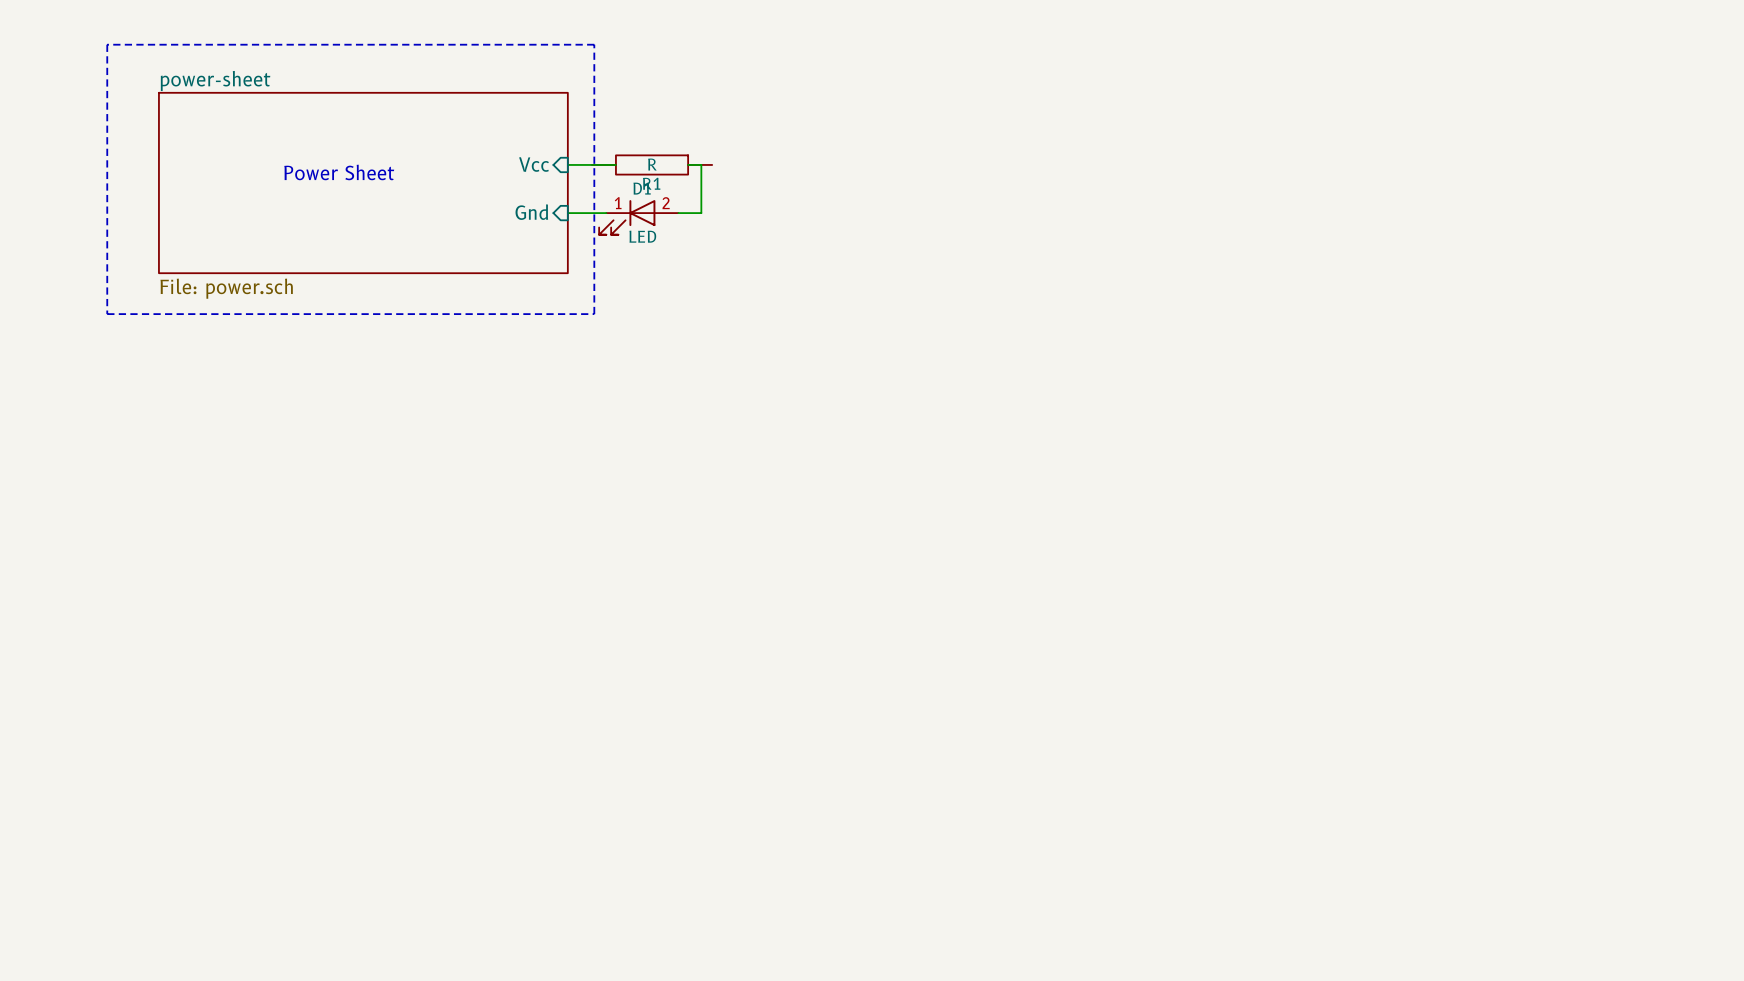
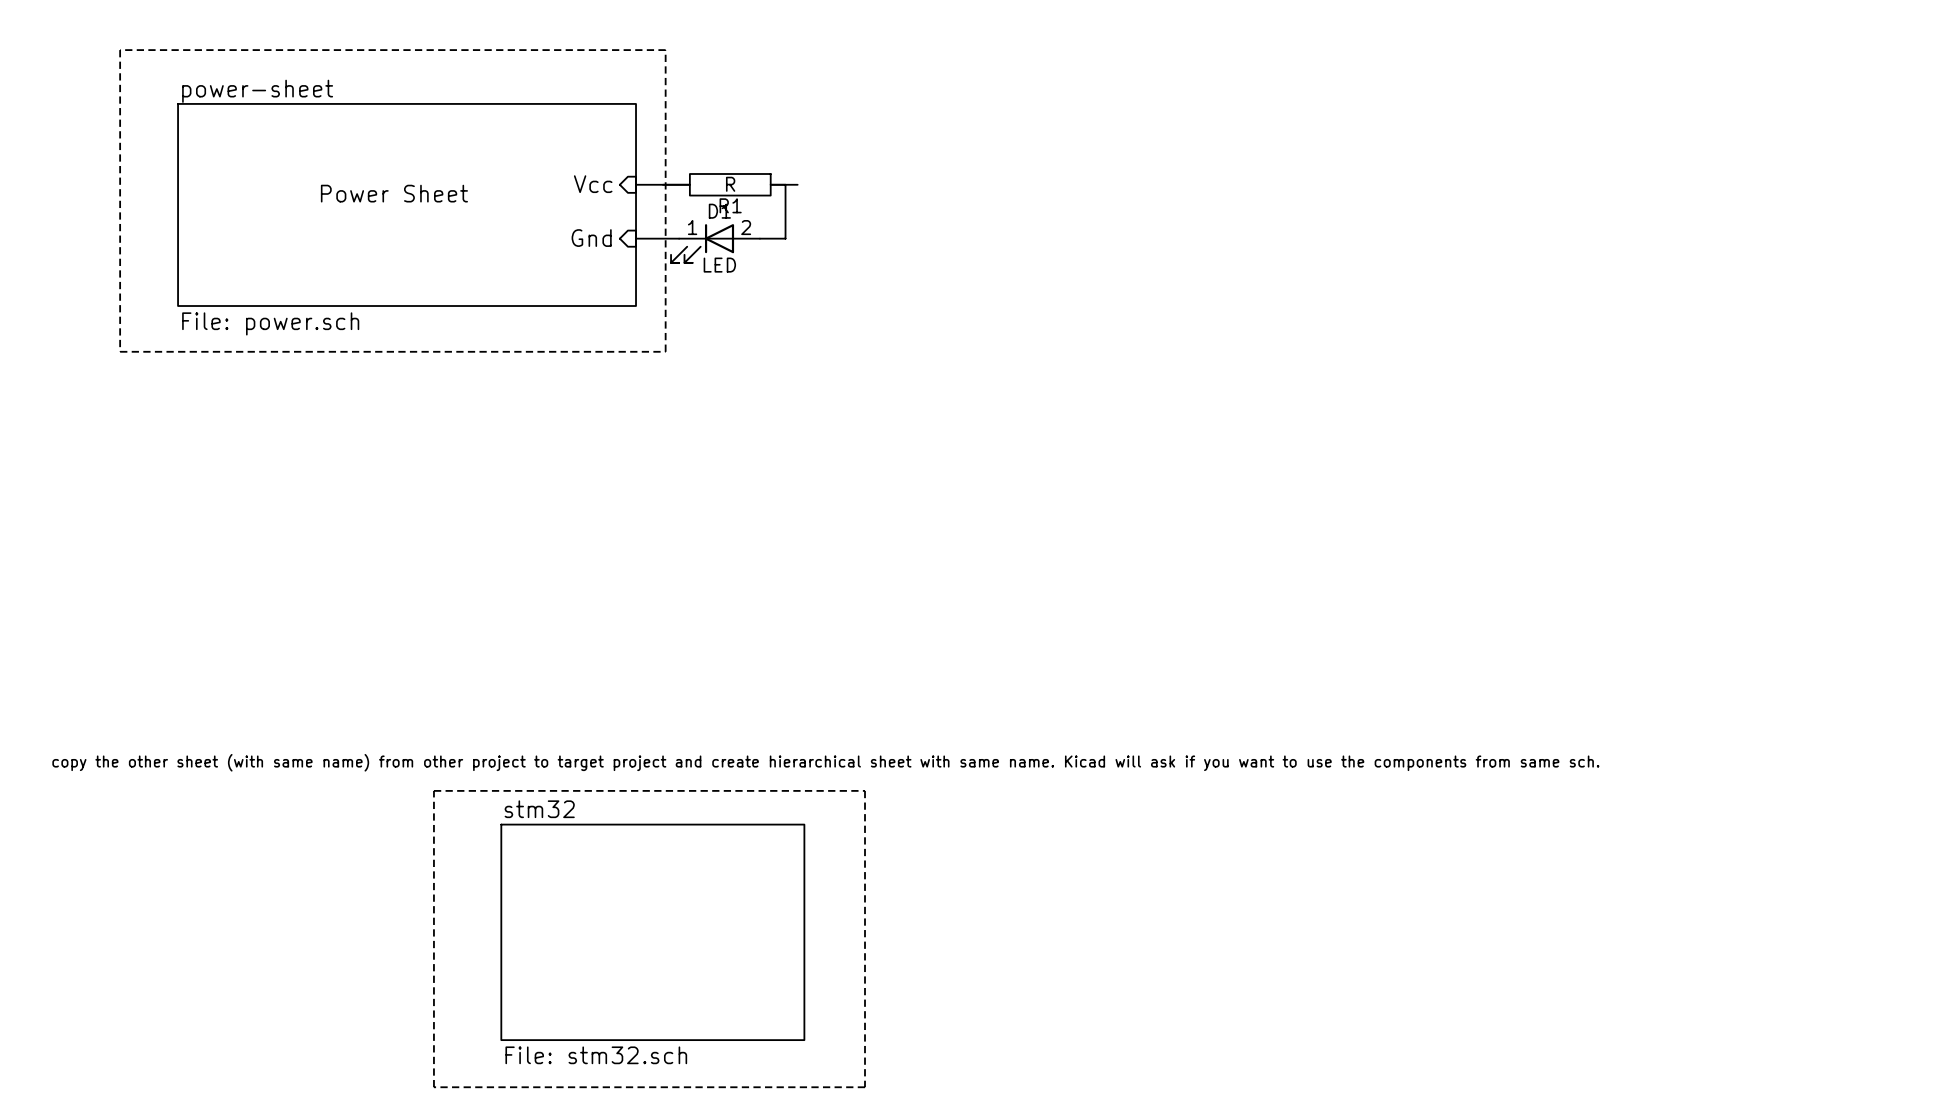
text: none -> copy the other sheet (with same name) from other project to target project and create hierarchical sheet with same name. Kicad will ask if you want to use the components from same sch. (825, 762)
line: none -> (433, 790) (865, 790) (865, 1087) (433, 1087) (433, 790)
sheet stm32: none -> File: stm32.sch (652, 932)

